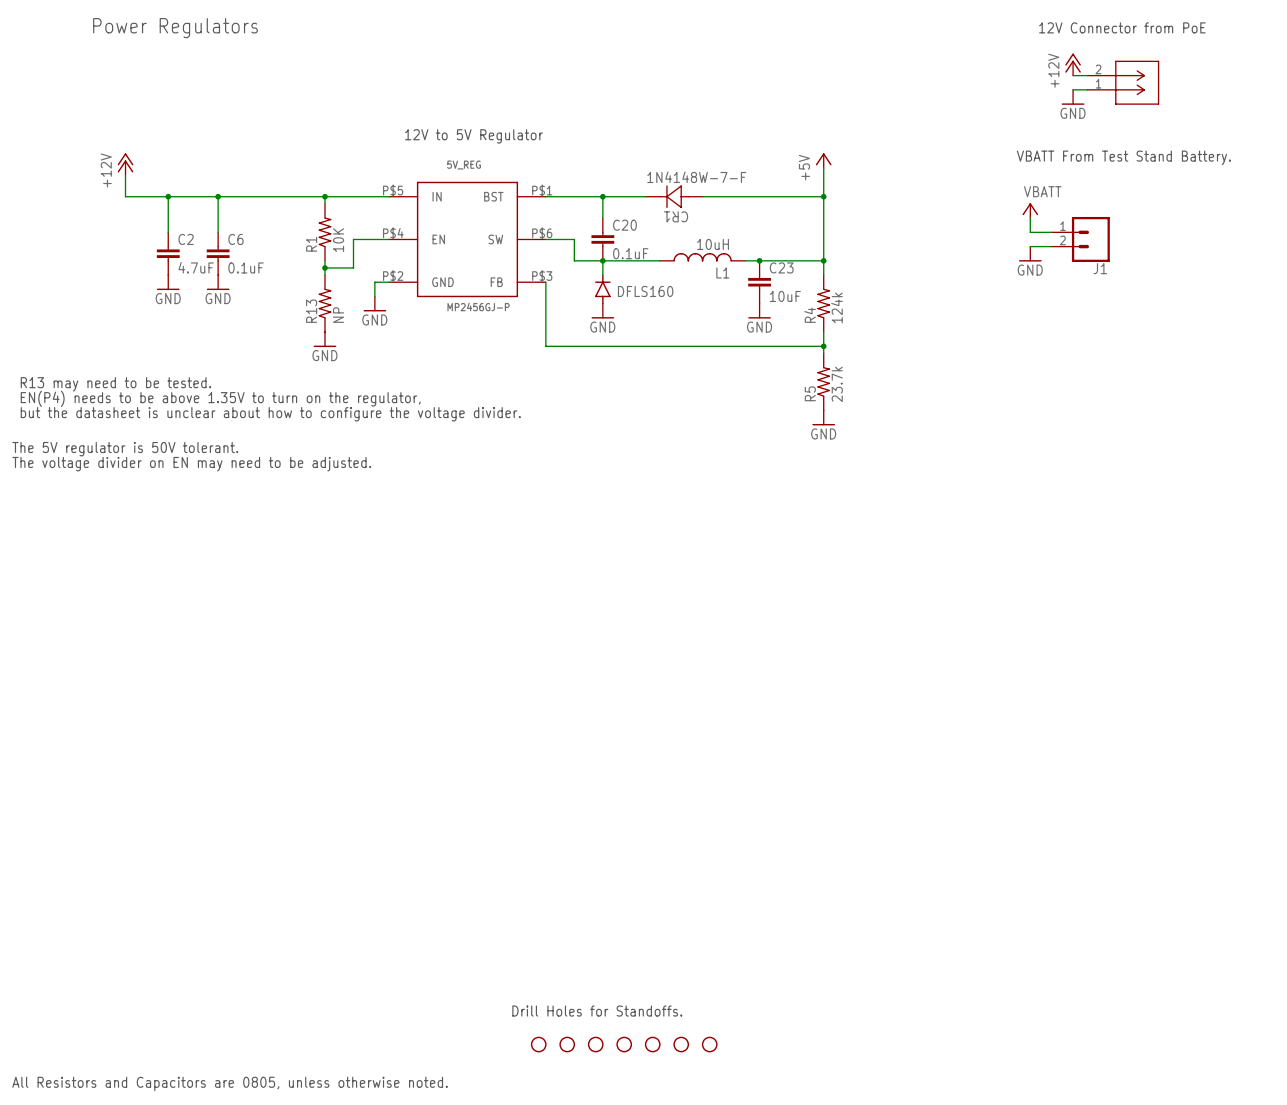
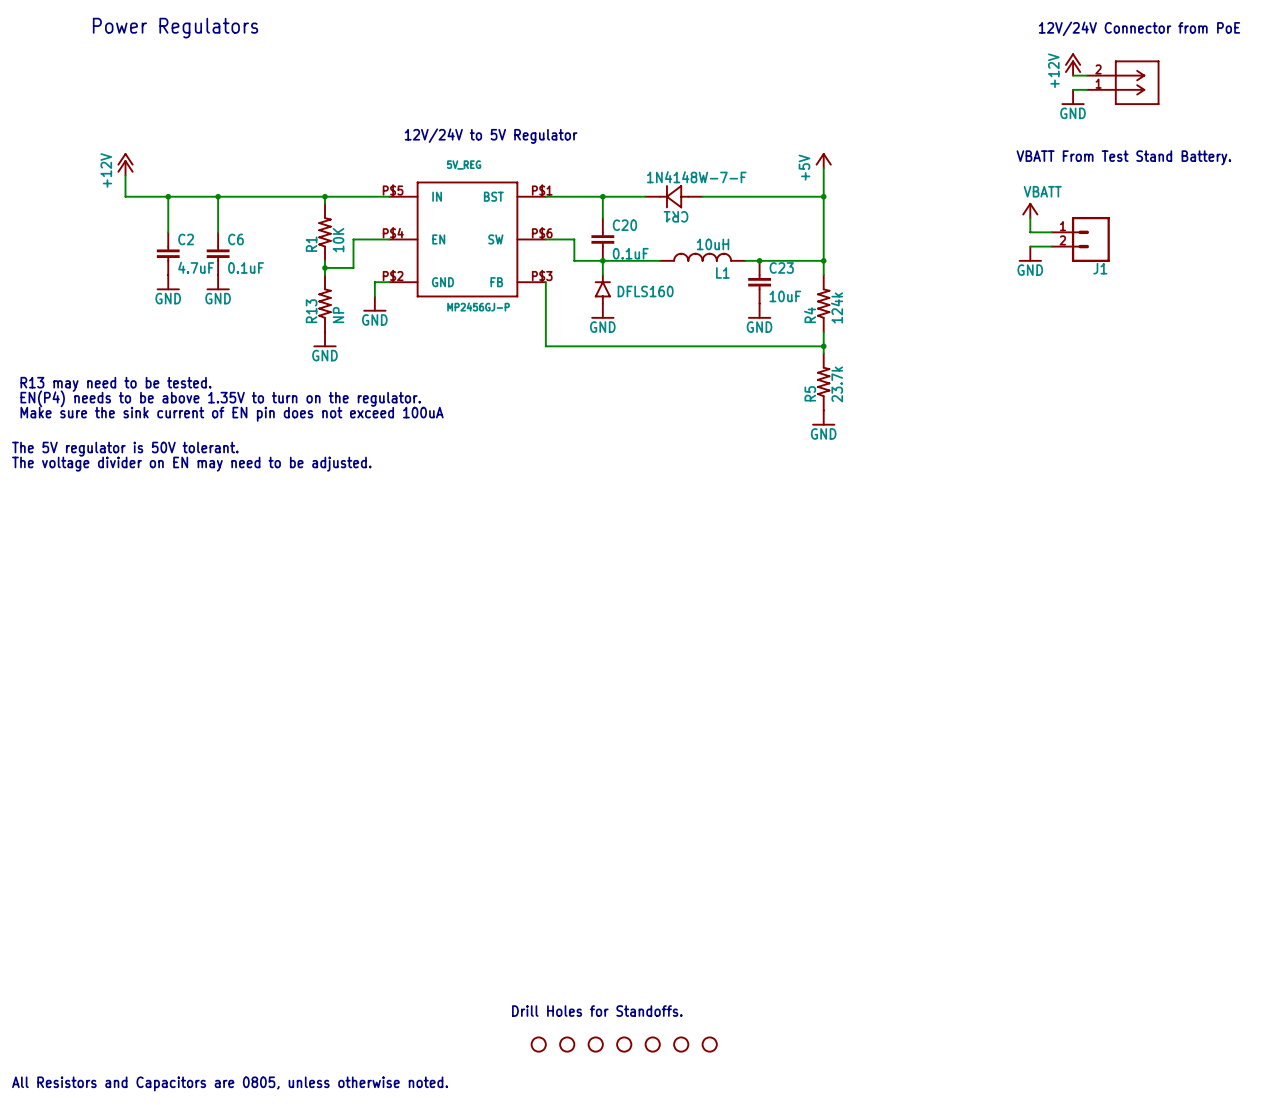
text: 12V Connector from PoE (1122, 27) -> 12V/24V Connector from PoE (1139, 28)
text: 12V to 5V Regulator (473, 136) -> 12V/24V to 5V Regulator (491, 136)
text: EN(P4) needs to be above 1.35V to turn on the regulator, (220, 398) -> EN(P4) needs to be above 1.35V to turn on the regulator. (220, 398)
text: but the datasheet is unclear about how to configure the voltage divider. (270, 414) -> Make sure the sink current of EN pin does not exceed 100uA (232, 414)

